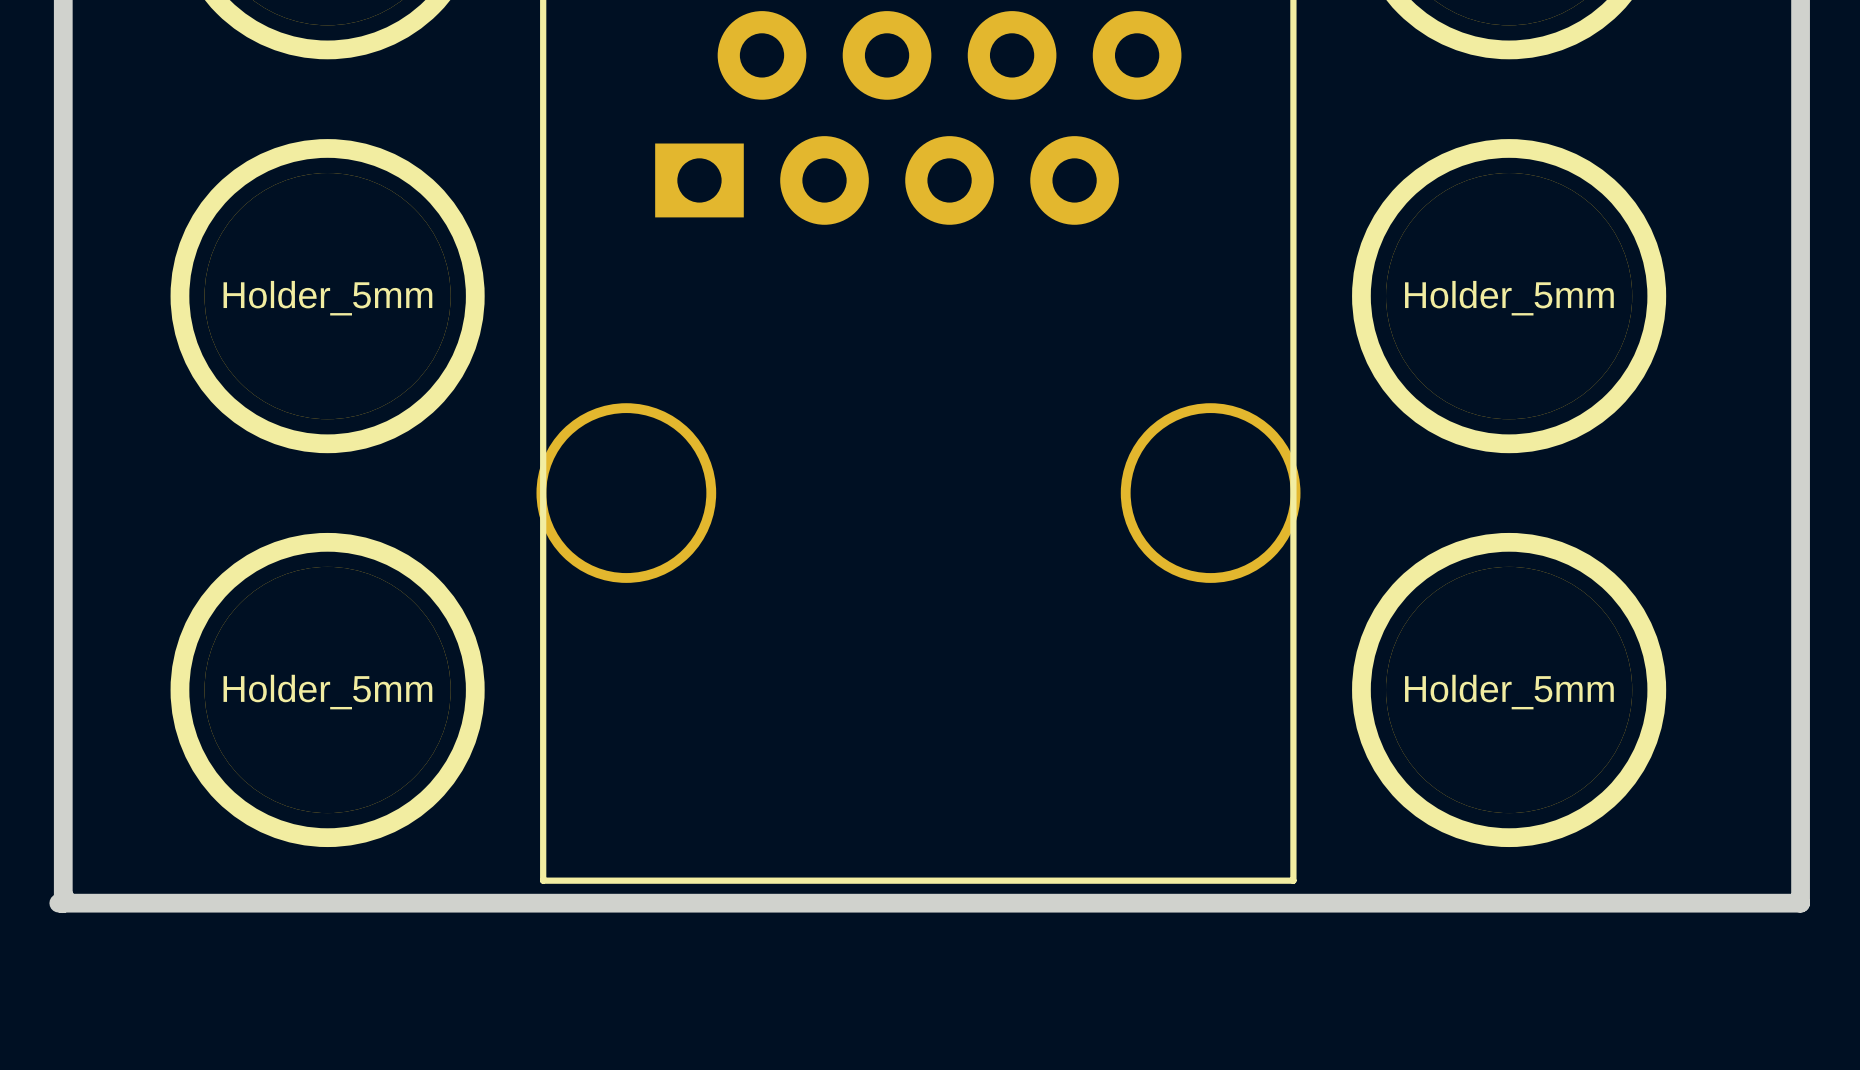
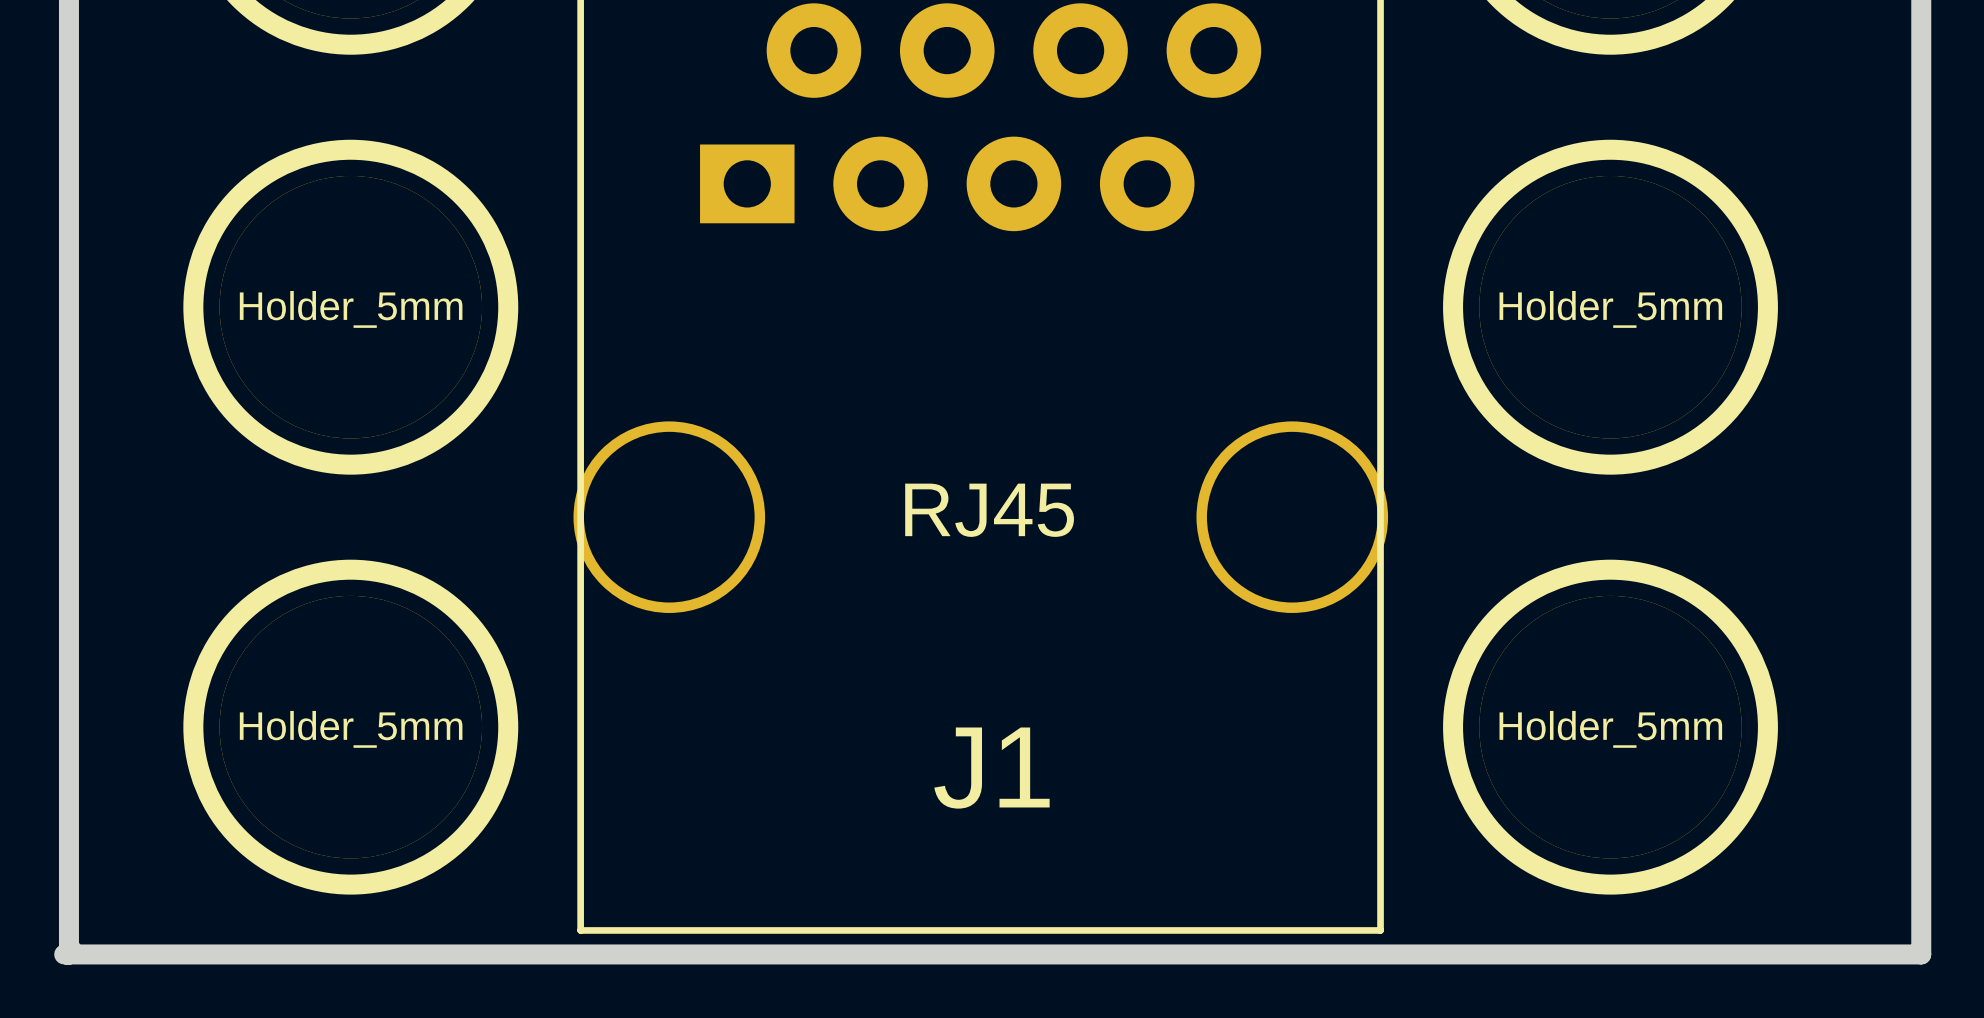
J1 value: none -> RJ45 (989, 510)
J1 name: none -> J1 (991, 768)

